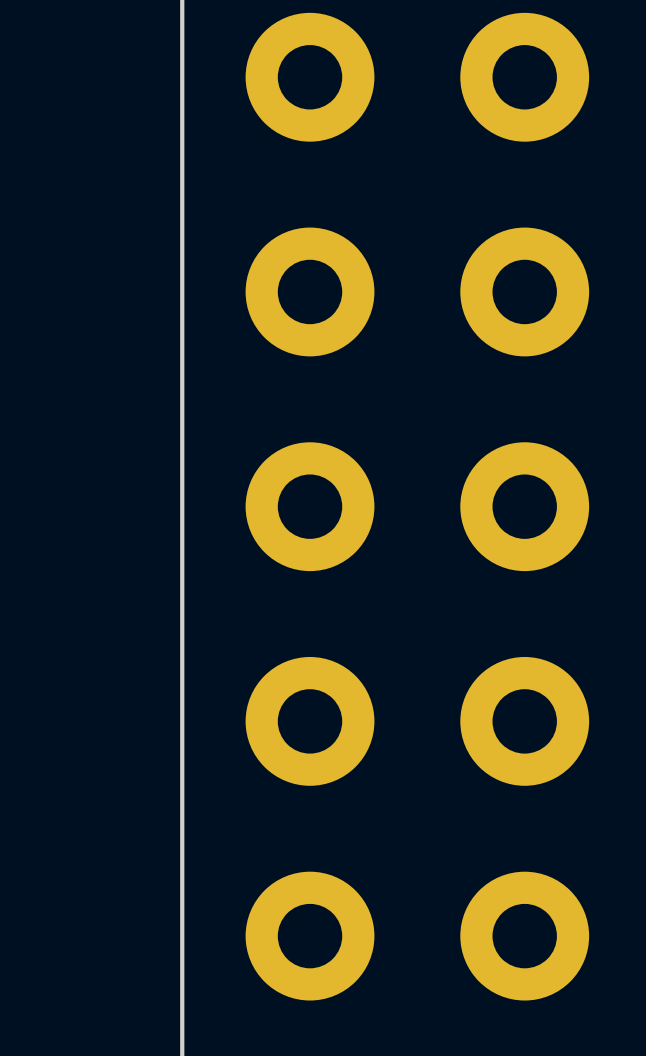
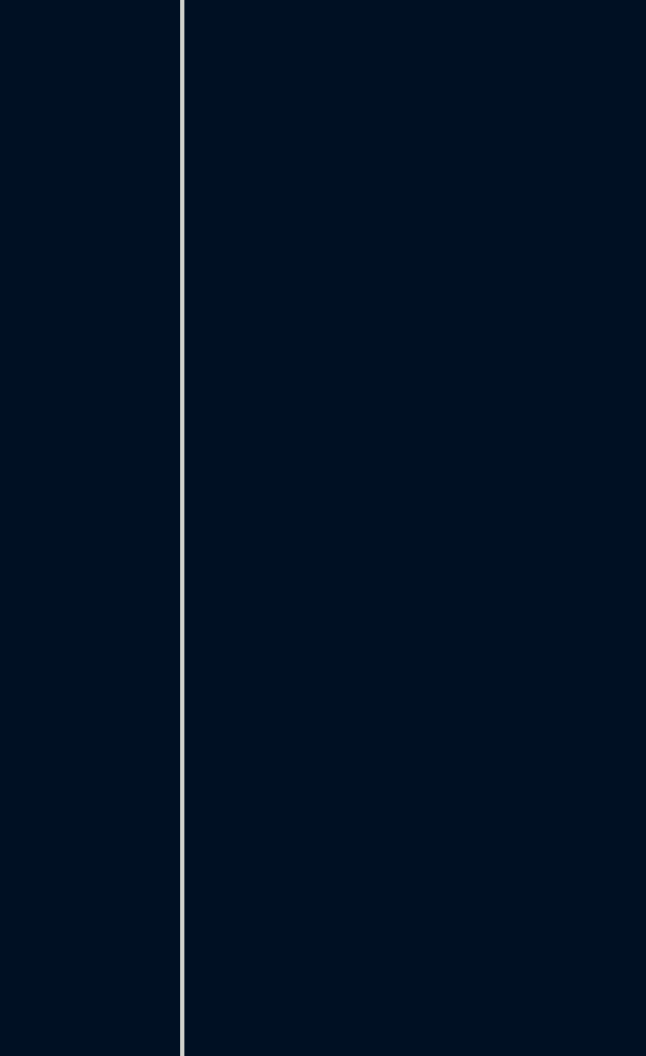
part: (417, 506) -> none

